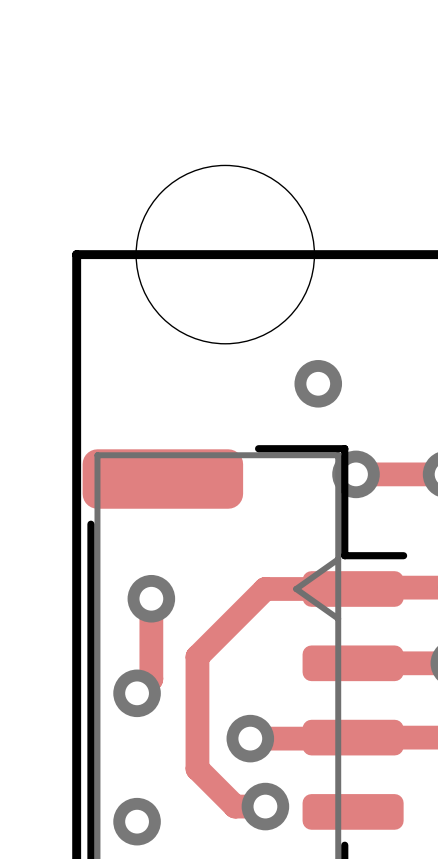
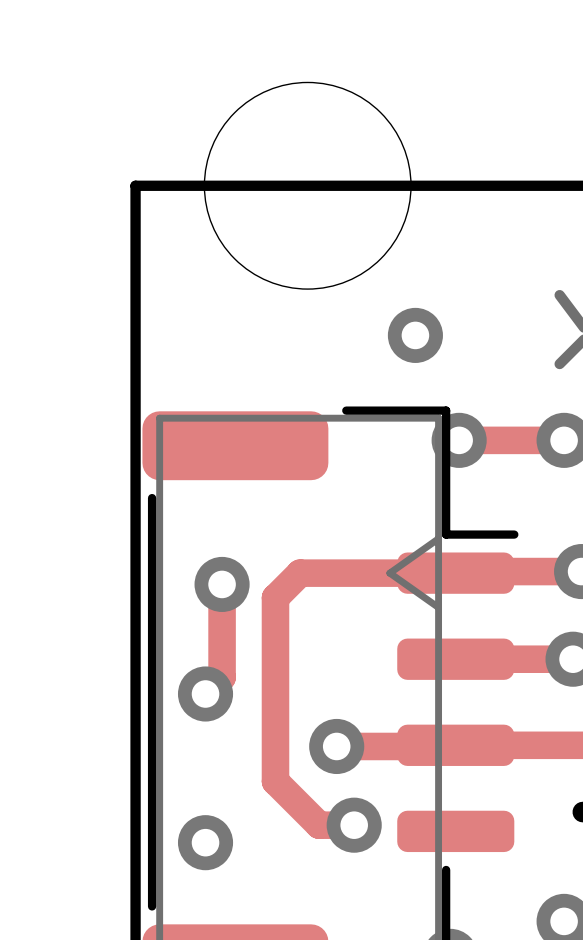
track: (265, 588) (197, 656) -> (354, 573) (300, 573) (275, 597) (275, 651)

